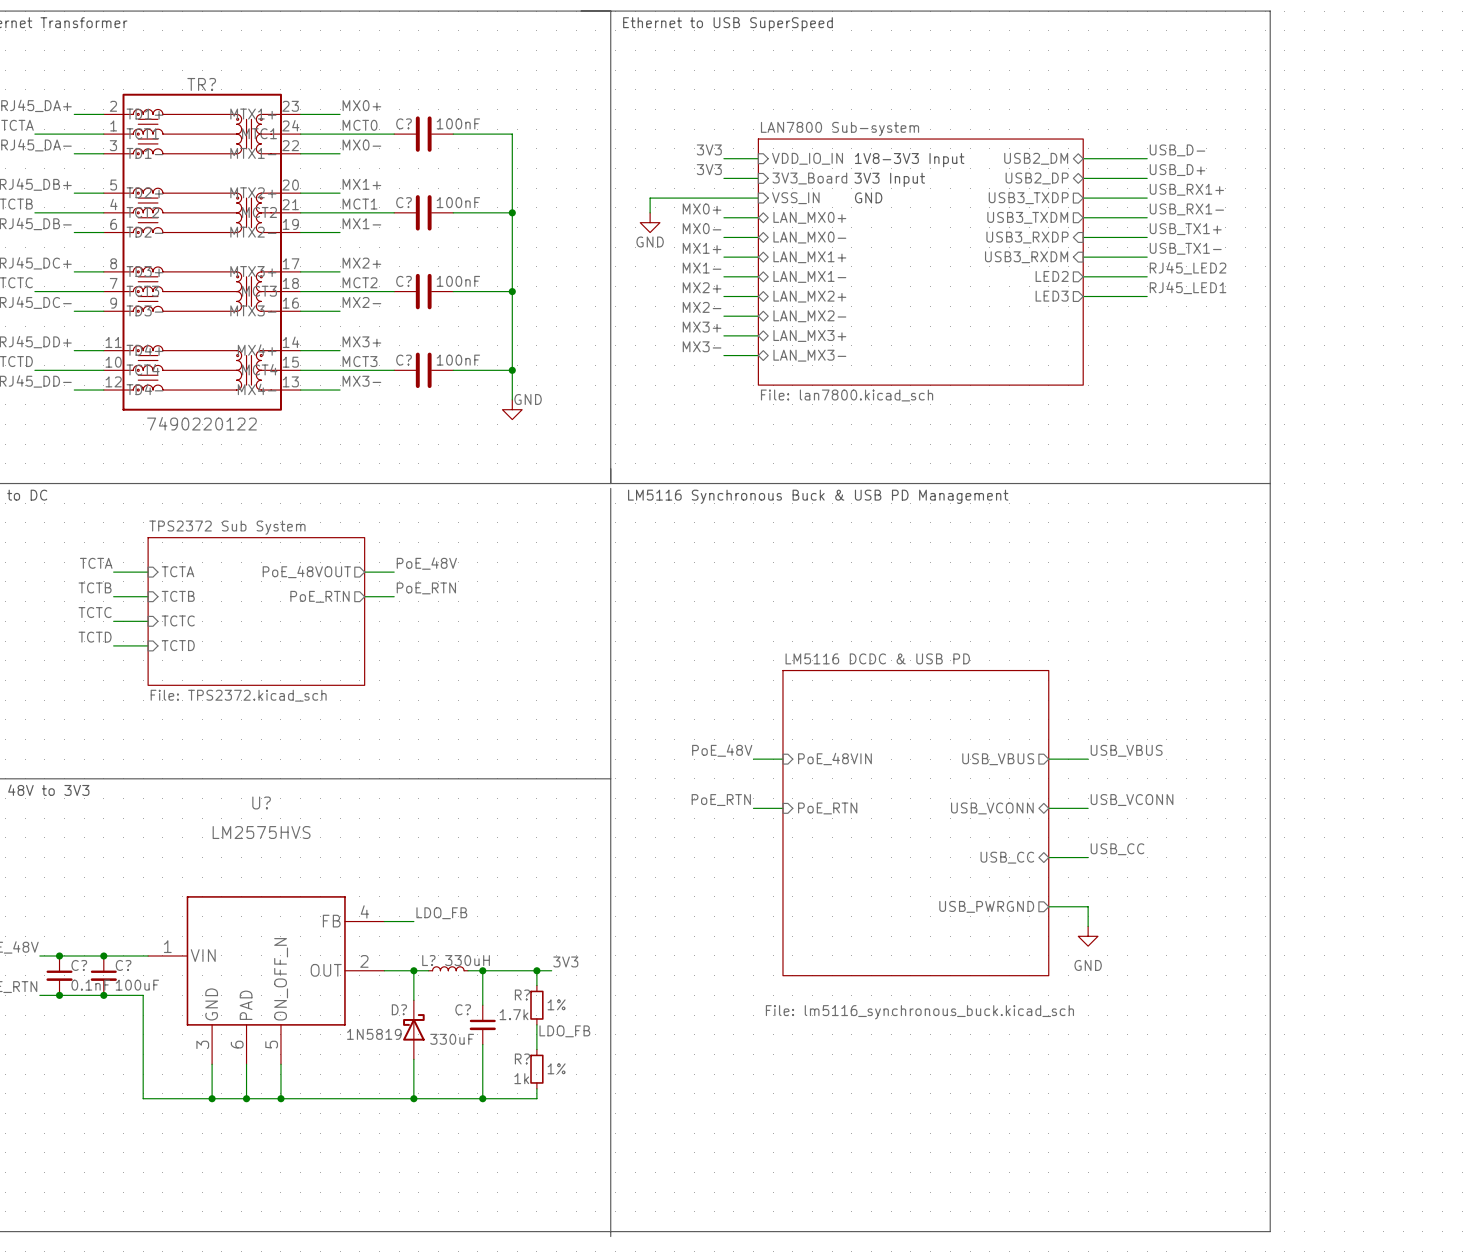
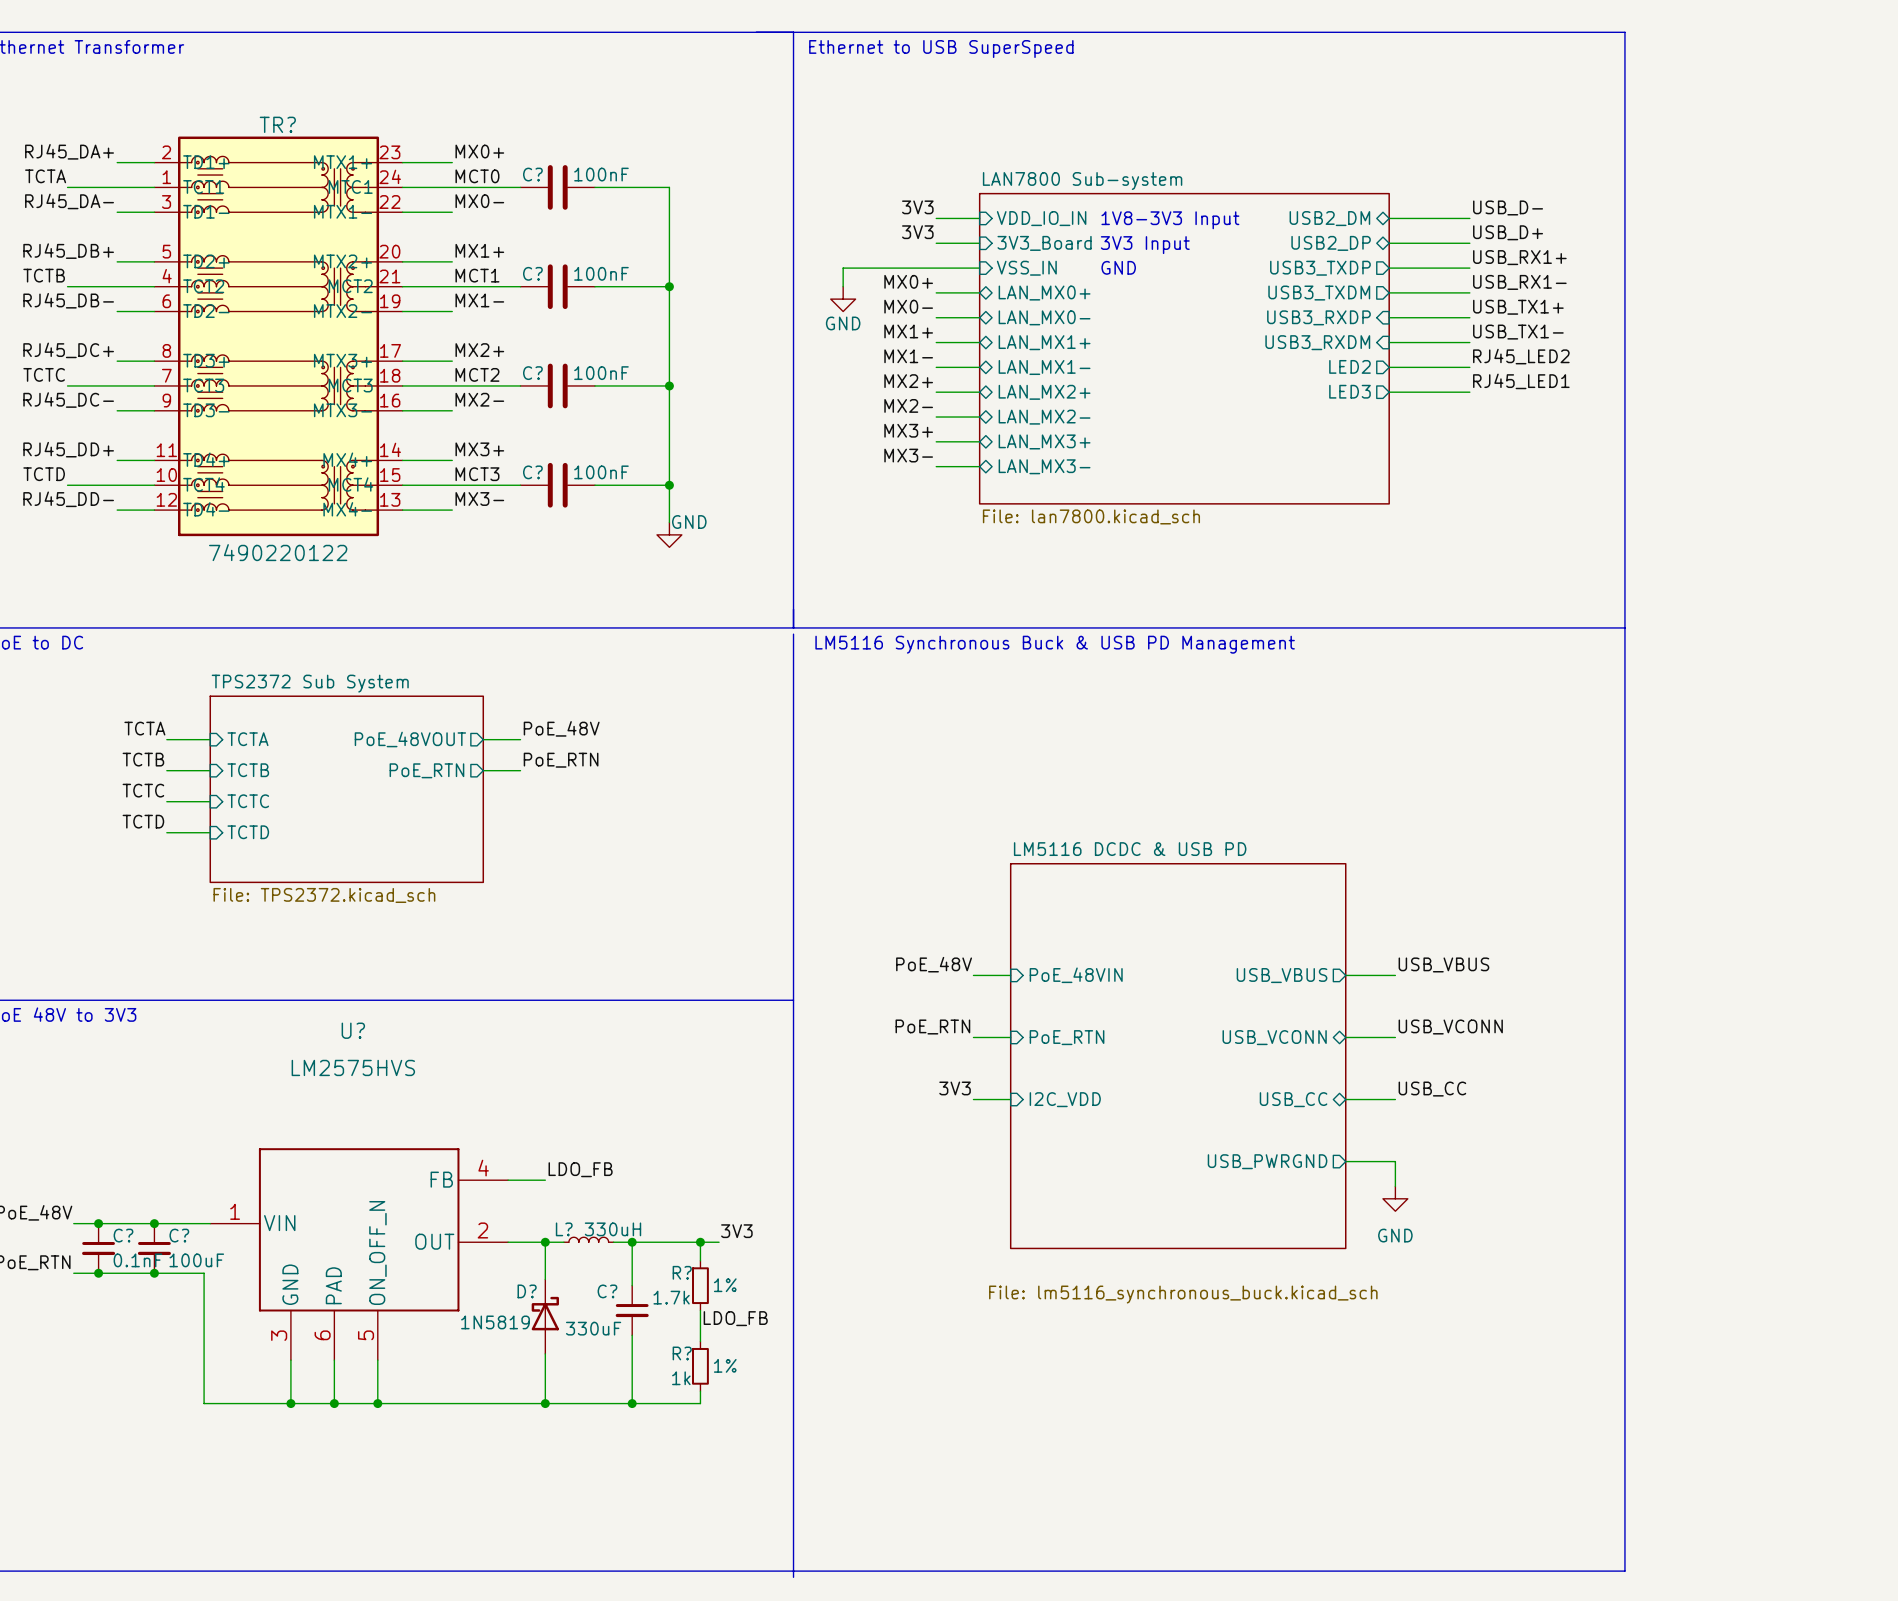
label: none -> 3V3 (955, 1088)
wire: none -> (973, 1099) (1010, 1099)
sheet pin: none -> I2C_VDD (1065, 1099)

